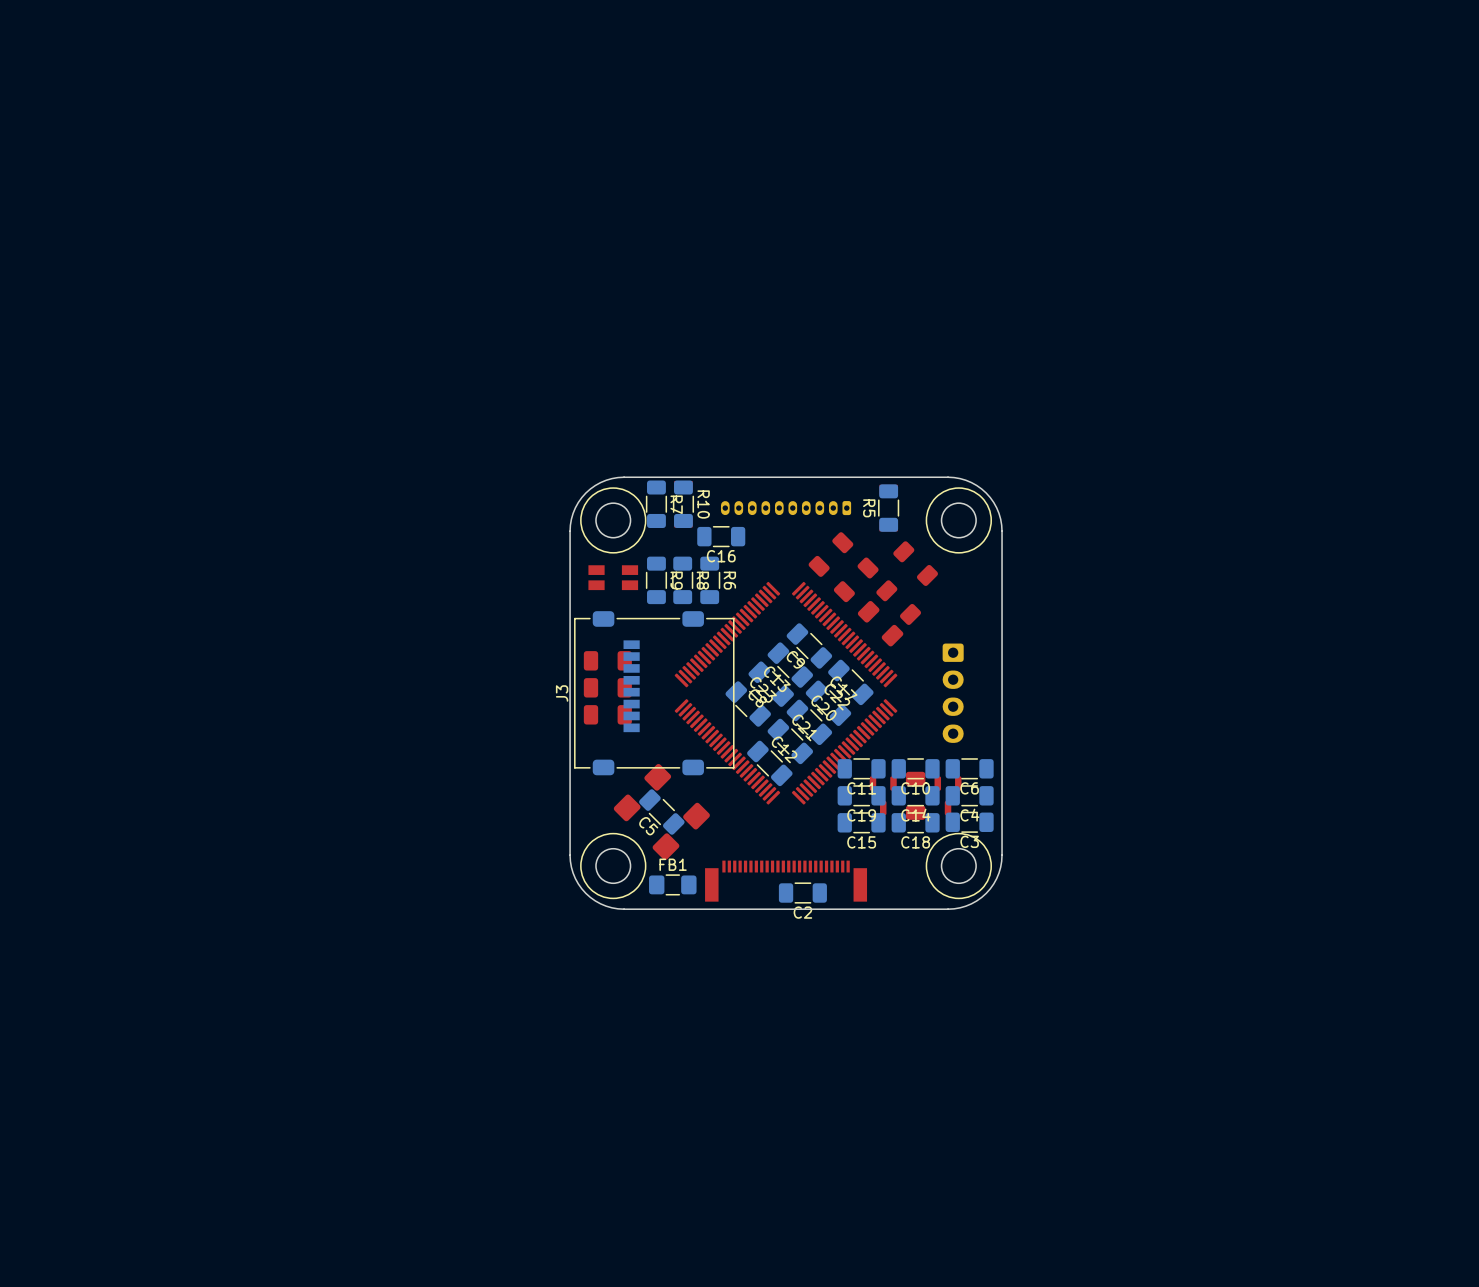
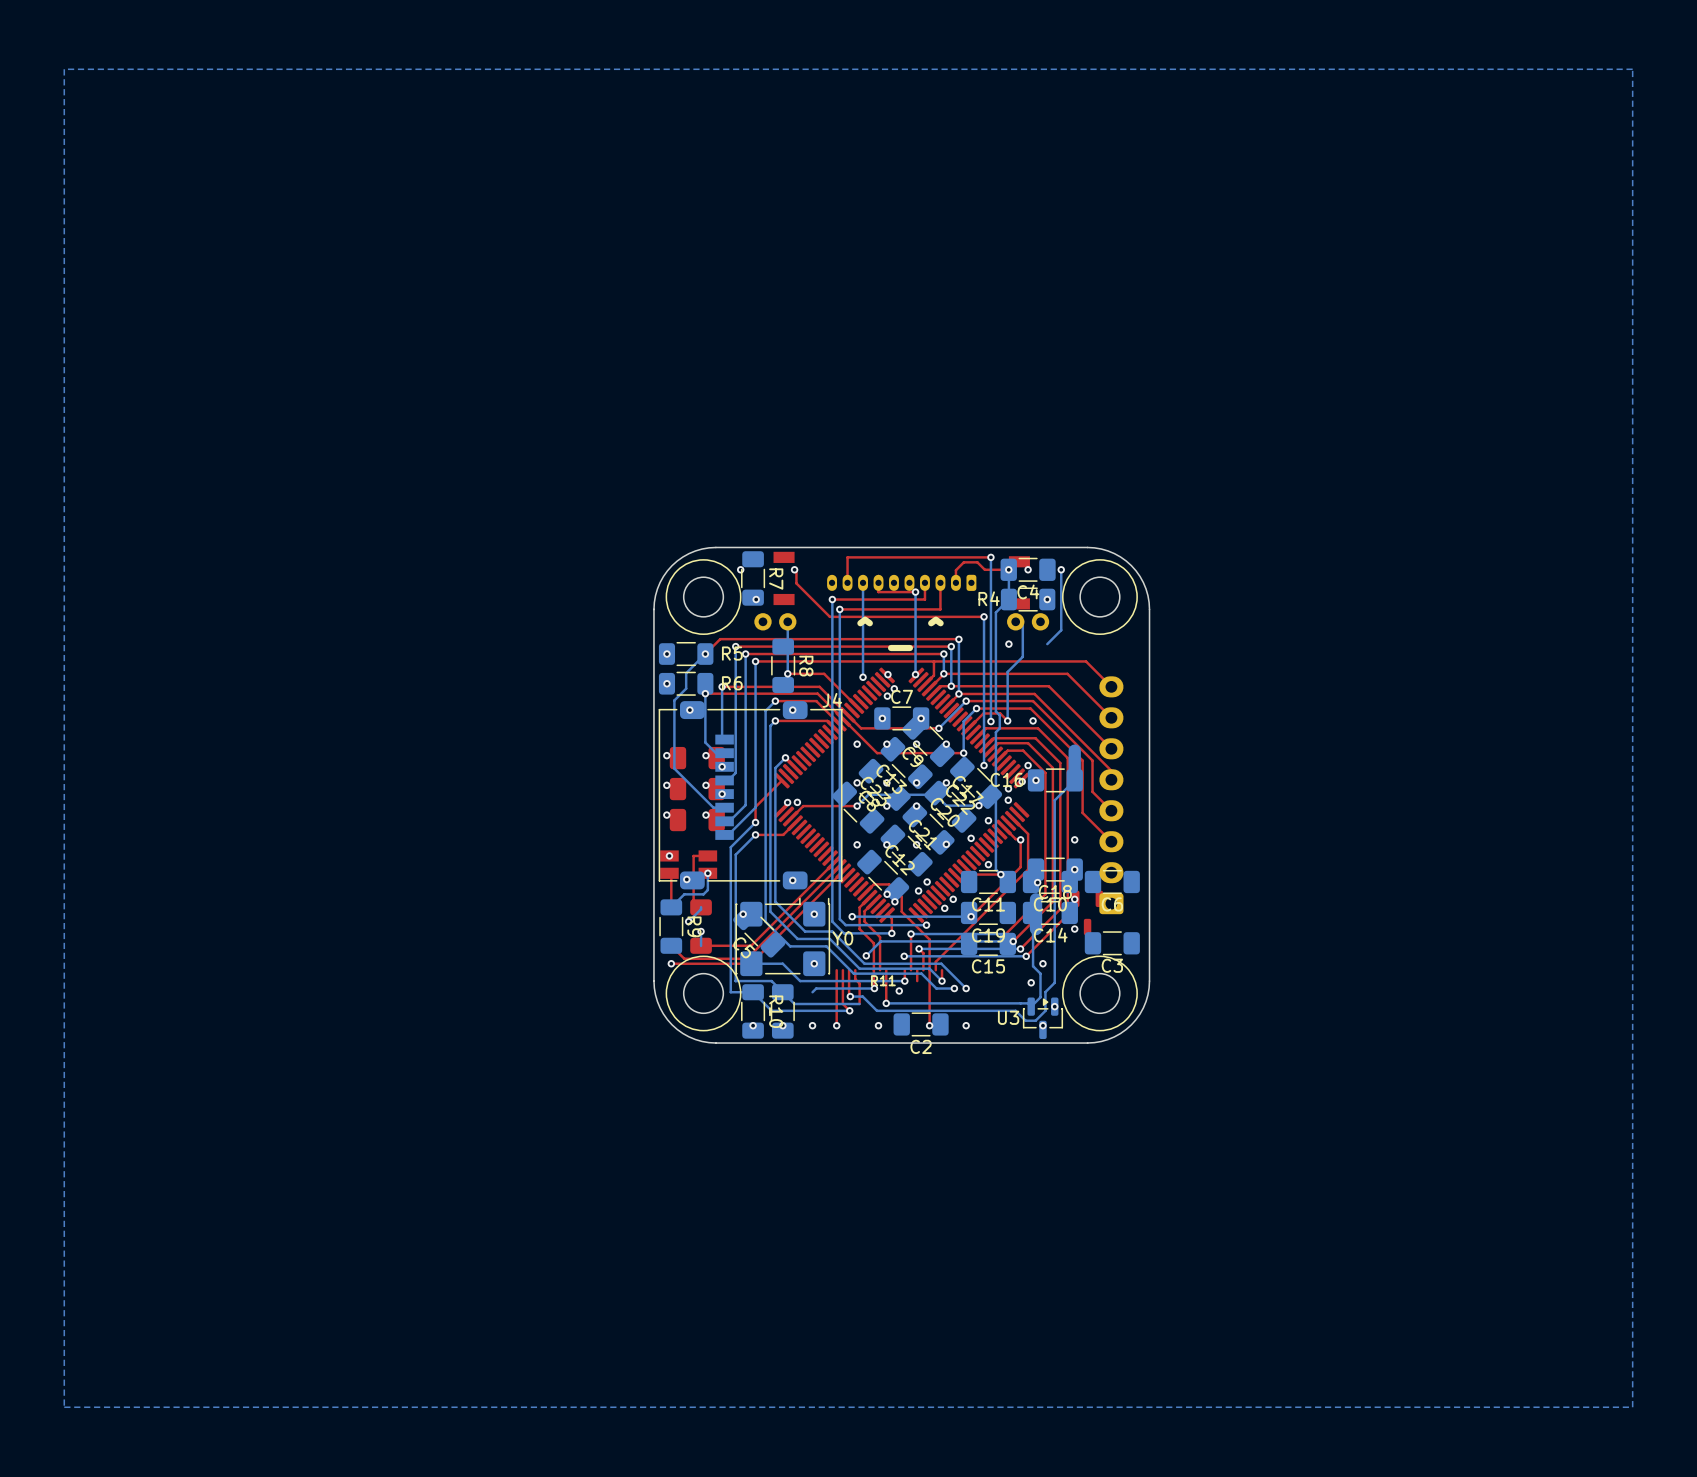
bottom zone outline: none -> (1632, 69) (64, 69) (64, 1407) (1632, 1407) (1632, 69)
bottom track: none -> (990, 557) (990, 721)
top track: none -> (990, 557) (847, 557) (847, 575)
via: none -> (990, 557)
via: none -> (740, 569)
via: none -> (794, 569)
top track: none -> (796, 569) (796, 583) (829, 616) (984, 616)
top track: none -> (1007, 569) (984, 569) (977, 562) (963, 562) (955, 570) (955, 575)
bottom track: none -> (1008, 569) (1008, 599) (995, 612) (995, 711) (999, 715) (999, 728) (995, 732) (995, 869) (1000, 874)
via: none -> (1008, 569)
via: none -> (1028, 569)
bottom track: none -> (1061, 569) (1061, 630) (1047, 644)
via: none -> (1061, 569)
bottom track: none -> (863, 575) (863, 677)
top track: none -> (878, 575) (878, 592) (915, 592)
top track: none -> (924, 575) (924, 599) (832, 599)
top track: none -> (940, 575) (940, 609) (839, 609)
R10 position: (683, 504) -> (753, 1011)
R5 name position: R5 (869, 508) -> R5 (732, 653)
R5 rotation: 0° (888, 508) -> 90° clockwise (686, 654)
R5 position: (888, 508) -> (686, 654)
bottom track: none -> (915, 592) (915, 674)
via: none -> (915, 592)
via: none -> (756, 599)
bottom track: none -> (832, 599) (832, 921) (844, 933) (891, 933)
via: none -> (832, 599)
R4: none -> (1028, 599)
via: none -> (1047, 599)
bottom track: none -> (839, 609) (839, 919) (845, 925) (926, 925)
via: none -> (839, 609)
C16 position: (721, 536) -> (1055, 780)
bottom track: none -> (984, 616) (984, 765)
via: none -> (984, 616)
part: none -> (775, 621)
bottom track: none -> (787, 621) (787, 673)
bottom track: none -> (1023, 621) (1022, 656) (1007, 671) (1007, 720)
part: none -> (1028, 621)
text: none -> ^ _ ^ (900, 633)
part: (830, 554) -> none
C16 name position: C16 (721, 556) -> C16 (1007, 779)
bottom track: none -> (958, 639) (958, 693)
top track: none -> (958, 639) (720, 639) (705, 654)
via: none -> (958, 639)
via: none -> (1008, 644)
bottom track: none -> (735, 646) (735, 772) (728, 780) (722, 780)
via: none -> (735, 646)
bottom track: none -> (951, 646) (951, 686)
top track: none -> (951, 646) (735, 646)
via: none -> (951, 646)
part: (915, 563) -> none
via: none -> (666, 654)
bottom track: none -> (705, 654) (686, 673) (686, 688) (674, 700) (674, 768) (713, 807) (730, 807)
via: none -> (705, 654)
bottom track: none -> (745, 654) (745, 805) (729, 821) (722, 821)
via: none -> (745, 654)
bottom track: none -> (943, 654) (943, 673)
top track: none -> (943, 654) (745, 654)
via: none -> (943, 654)
bottom track: none -> (755, 661) (755, 807) (728, 834) (722, 834)
top track: none -> (755, 661) (1086, 661) (1111, 686)
via: none -> (755, 661)
top track: none -> (933, 661) (933, 675) (925, 684)
part position: (613, 577) -> (688, 864)
part: (856, 579) -> none
R9 position: (656, 580) -> (671, 926)
R6 rotation: 0° (709, 580) -> 90° clockwise (686, 683)
R6 position: (709, 580) -> (686, 683)
top track: none -> (787, 673) (824, 673) (856, 706)
via: none -> (787, 673)
via: none -> (943, 673)
via: none -> (887, 674)
via: none -> (915, 674)
via: none -> (863, 677)
via: none -> (666, 683)
bottom track: none -> (722, 686) (722, 739)
top track: none -> (722, 686) (819, 686) (861, 728) (938, 728)
via: none -> (722, 686)
via: none -> (951, 686)
via: none -> (894, 688)
top track: none -> (929, 688) (943, 673) (1067, 673) (1111, 717)
part: (898, 602) -> none
bottom track: none -> (705, 693) (705, 742) (716, 753) (722, 753)
top track: none -> (705, 693) (817, 693) (877, 753) (963, 753)
via: none -> (705, 693)
top track: none -> (933, 692) (940, 686) (1048, 686) (1111, 748)
via: none -> (958, 693)
via: none -> (887, 696)
bottom track: none -> (775, 701) (765, 710) (765, 921) (790, 946) (826, 946) (853, 973) (921, 973) (936, 988) (954, 988)
top track: none -> (775, 701) (816, 701) (838, 723)
via: none -> (775, 701)
bottom track: none -> (966, 701) (938, 728)
top track: none -> (966, 701) (1033, 701) (1092, 760) (1092, 791) (1111, 810)
via: none -> (966, 701)
top track: none -> (947, 706) (958, 693) (1034, 693) (1111, 770) (1111, 779)
bottom track: none -> (976, 708) (963, 721) (963, 753)
top track: none -> (976, 708) (1030, 708) (1082, 760) (1082, 812) (1111, 841)
via: none -> (976, 708)
via: none -> (689, 710)
via: none -> (792, 710)
part: (880, 623) -> none
via: none -> (882, 718)
C7: none -> (901, 718)
via: none -> (921, 718)
bottom track: none -> (775, 720) (770, 725) (770, 911) (797, 938) (829, 938) (859, 968) (929, 968) (942, 981)
top track: none -> (775, 720) (827, 720) (834, 728)
via: none -> (775, 720)
via: none -> (990, 721)
top track: none -> (1007, 720) (1000, 713) (983, 713) (968, 728)
via: none -> (1007, 720)
via: none -> (1033, 720)
via: none -> (938, 728)
top track: none -> (977, 736) (986, 728) (1038, 728) (1067, 758) (1067, 914) (1026, 956)
via: none -> (857, 744)
via: none -> (886, 744)
via: none -> (916, 744)
via: none -> (946, 744)
top track: none -> (986, 745) (993, 738) (1035, 738) (1060, 763) (1060, 909) (1020, 948) (1018, 948)
top track: none -> (990, 749) (997, 743) (1028, 743) (1052, 768) (1052, 901) (1013, 941)
bottom track: none -> (1074, 750) (1074, 780) (1054, 800) (1054, 982) (1045, 992) (1045, 1010) (1035, 1020) (1025, 1020) (1015, 1010) (876, 1010) (862, 996) (850, 996)
via: none -> (963, 753)
via: none -> (666, 755)
via: none -> (706, 755)
bottom track: none -> (785, 757) (775, 768) (775, 901) (805, 931) (832, 931) (864, 963) (941, 963) (966, 988)
via: none -> (785, 757)
top track: none -> (999, 758) (1007, 750) (1023, 750) (1045, 772) (1045, 894) (1005, 934)
via: none -> (984, 765)
via: none -> (1028, 765)
via: none -> (722, 766)
top track: none -> (781, 780) (755, 806) (755, 822)
via: none -> (1036, 780)
via: none -> (1022, 781)
via: none -> (857, 782)
via: none -> (886, 782)
via: none -> (916, 782)
via: none -> (946, 782)
via: none -> (666, 785)
via: none -> (706, 785)
via: none -> (1008, 788)
via: none -> (722, 794)
J3 name: J3 (562, 693) -> J4 (832, 700)
part: (953, 693) -> none
part: none -> (1111, 795)
via: none -> (1008, 800)
via: none -> (787, 802)
via: none -> (797, 802)
top track: none -> (857, 806) (803, 806) (790, 818)
via: none -> (857, 806)
via: none -> (886, 806)
via: none -> (916, 806)
bottom track: none -> (978, 805) (946, 805) (935, 794) (868, 794) (857, 806)
via: none -> (978, 805)
via: none -> (666, 815)
via: none -> (706, 815)
top track: none -> (1012, 818) (1028, 834) (1028, 869) (935, 961) (935, 970)
via: none -> (988, 820)
bottom track: none -> (755, 822) (730, 847) (730, 992) (753, 992) (771, 1010) (849, 1010)
via: none -> (755, 822)
top track: none -> (795, 823) (783, 834) (755, 834)
top track: none -> (1004, 827) (1015, 839) (1020, 839) (1020, 867) (971, 916)
bottom track: none -> (755, 834) (735, 854) (735, 981) (771, 981) (794, 1003) (859, 1003)
via: none -> (755, 834)
via: none -> (971, 838)
via: none -> (1020, 839)
via: none -> (1074, 839)
via: none -> (857, 844)
via: none -> (886, 844)
via: none -> (916, 844)
via: none -> (946, 844)
via: none -> (669, 855)
top track: none -> (707, 855) (693, 855) (693, 899) (701, 909)
top track: none -> (834, 862) (751, 945) (701, 945)
via: none -> (988, 864)
top track: none -> (838, 866) (746, 958) (684, 958) (671, 945)
top track: none -> (964, 866) (972, 874) (1000, 874)
via: none -> (1074, 869)
top track: none -> (843, 871) (750, 963) (671, 963)
top track: none -> (669, 873) (671, 875) (671, 907)
bottom track: none -> (707, 873) (707, 890) (703, 894) (684, 894) (671, 907) (671, 909)
via: none -> (707, 873)
via: none -> (1000, 874)
via: none -> (686, 879)
via: none -> (792, 880)
via: none -> (927, 881)
via: none -> (1037, 882)
via: none -> (918, 890)
top track: none -> (865, 893) (873, 884) (889, 884) (901, 896) (901, 911) (929, 939) (929, 1025)
via: none -> (887, 894)
top track: none -> (869, 897) (859, 907) (859, 929) (873, 943) (874, 988)
via: none -> (953, 899)
bottom track: none -> (1036, 899) (1036, 929) (1033, 931) (1033, 966) (1040, 973) (1040, 997) (1031, 1006) (1027, 1003) (886, 1003)
via: none -> (1074, 899)
top track: none -> (873, 901) (864, 911) (864, 921) (880, 937) (880, 970)
via: none -> (894, 901)
bottom track: none -> (701, 907) (688, 921)
via: none -> (944, 908)
part: (883, 795) -> none
part: (915, 795) -> none
C4 position: (969, 795) -> (1028, 569)
via: none -> (743, 914)
via: none -> (814, 914)
top track: none -> (887, 915) (891, 918) (891, 933)
via: none -> (852, 916)
bottom track: none -> (971, 916) (852, 916)
via: none -> (971, 916)
via: none -> (688, 921)
via: none -> (926, 925)
part: none -> (701, 926)
via: none -> (1074, 929)
bottom track: none -> (701, 931) (701, 945)
via: none -> (701, 931)
Y0 side: top (661, 812) -> bottom (782, 936)
via: none -> (891, 933)
top track: none -> (911, 934) (911, 970)
via: none -> (911, 934)
bottom track: none -> (1005, 934) (911, 934)
bottom track: none -> (1013, 941) (880, 941) (866, 955)
via: none -> (1013, 941)
C18 position: (915, 822) -> (1055, 869)
top track: none -> (919, 948) (923, 953) (923, 970)
via: none -> (919, 948)
bottom track: none -> (1018, 948) (919, 948)
via: none -> (1020, 948)
via: none -> (866, 955)
via: none -> (904, 956)
bottom track: none -> (1026, 956) (904, 956)
via: none -> (1026, 956)
via: none -> (671, 963)
bottom track: none -> (751, 963) (782, 963) (800, 981) (904, 981)
via: none -> (814, 963)
via: none -> (1042, 963)
top track: none -> (836, 970) (836, 1025)
top track: none -> (842, 970) (842, 1004) (849, 1010)
top track: none -> (849, 970) (850, 996)
top track: none -> (855, 970) (855, 979) (859, 983) (859, 1003)
top track: none -> (886, 970) (886, 1003)
top track: none -> (904, 970) (904, 981)
top track: none -> (917, 970) (917, 981)
top track: none -> (942, 970) (942, 981)
via: none -> (904, 981)
via: none -> (942, 981)
via: none -> (1031, 982)
bottom track: none -> (874, 988) (816, 988) (812, 992)
via: none -> (874, 988)
via: none -> (954, 988)
via: none -> (966, 988)
via: none -> (899, 990)
via: none -> (850, 996)
via: none -> (886, 1003)
via: none -> (1054, 1006)
R11: none -> (782, 1011)
via: none -> (849, 1010)
part: (786, 881) -> none
FB1: (672, 884) -> none
U3: none -> (1042, 1018)
via: none -> (753, 1025)
via: none -> (782, 1025)
via: none -> (812, 1025)
via: none -> (836, 1025)
via: none -> (878, 1025)
via: none -> (929, 1025)
via: none -> (966, 1025)
via: none -> (1042, 1025)

